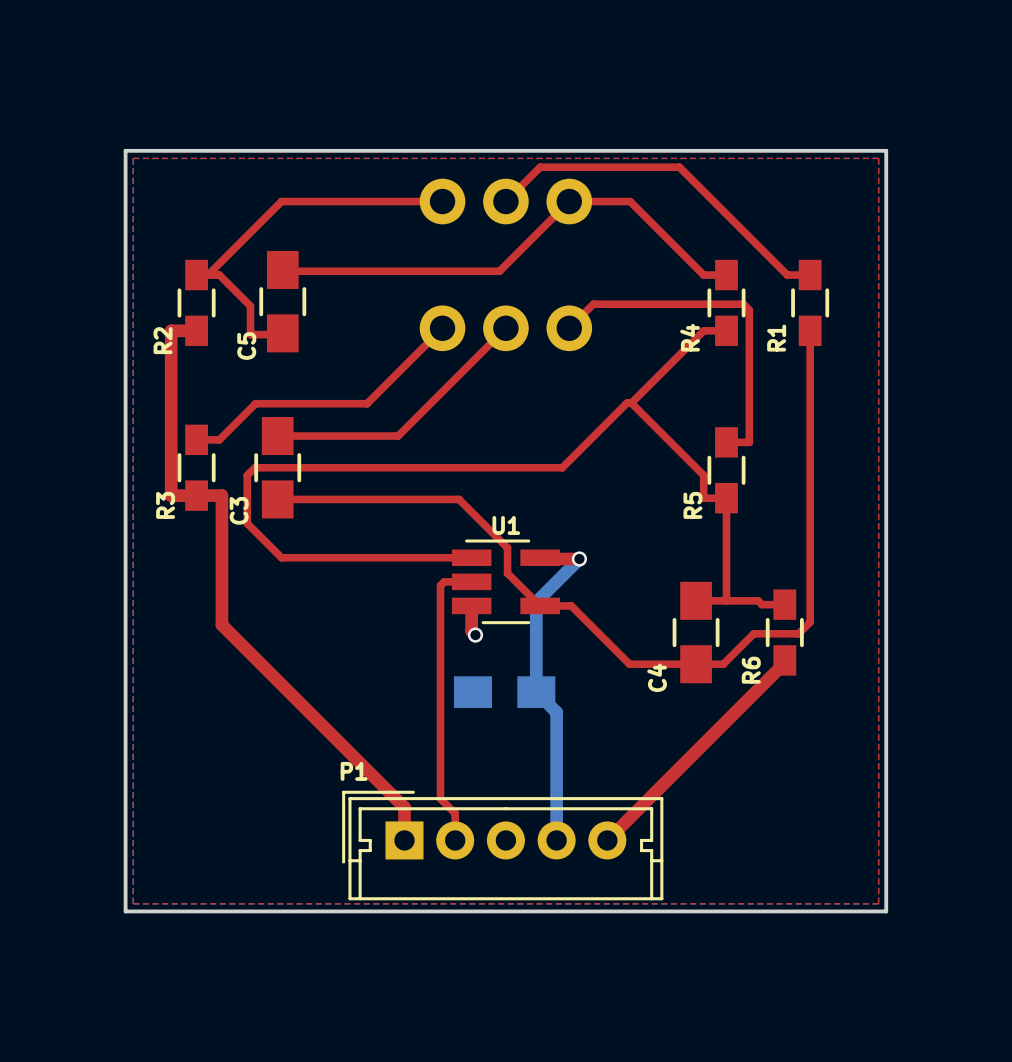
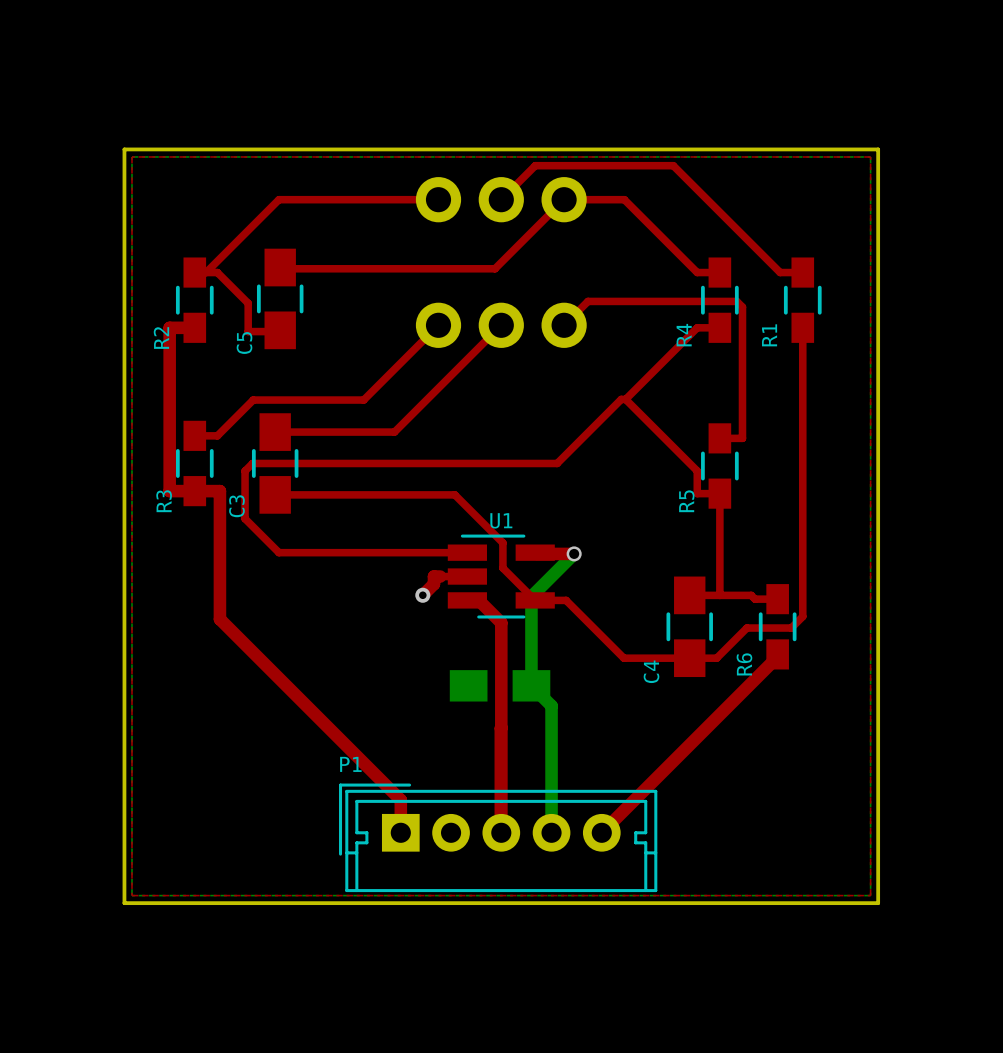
top track: (444, 581) (440, 585) (440, 798) (455, 813) (455, 840) -> (440, 576) (433, 576) (433, 584) (422, 595)
via: none -> (422, 595)
top track: (471, 605) (471, 631) (475, 635) -> (467, 600) (478, 600) (501, 622) (501, 832)
via: (475, 635) -> none

